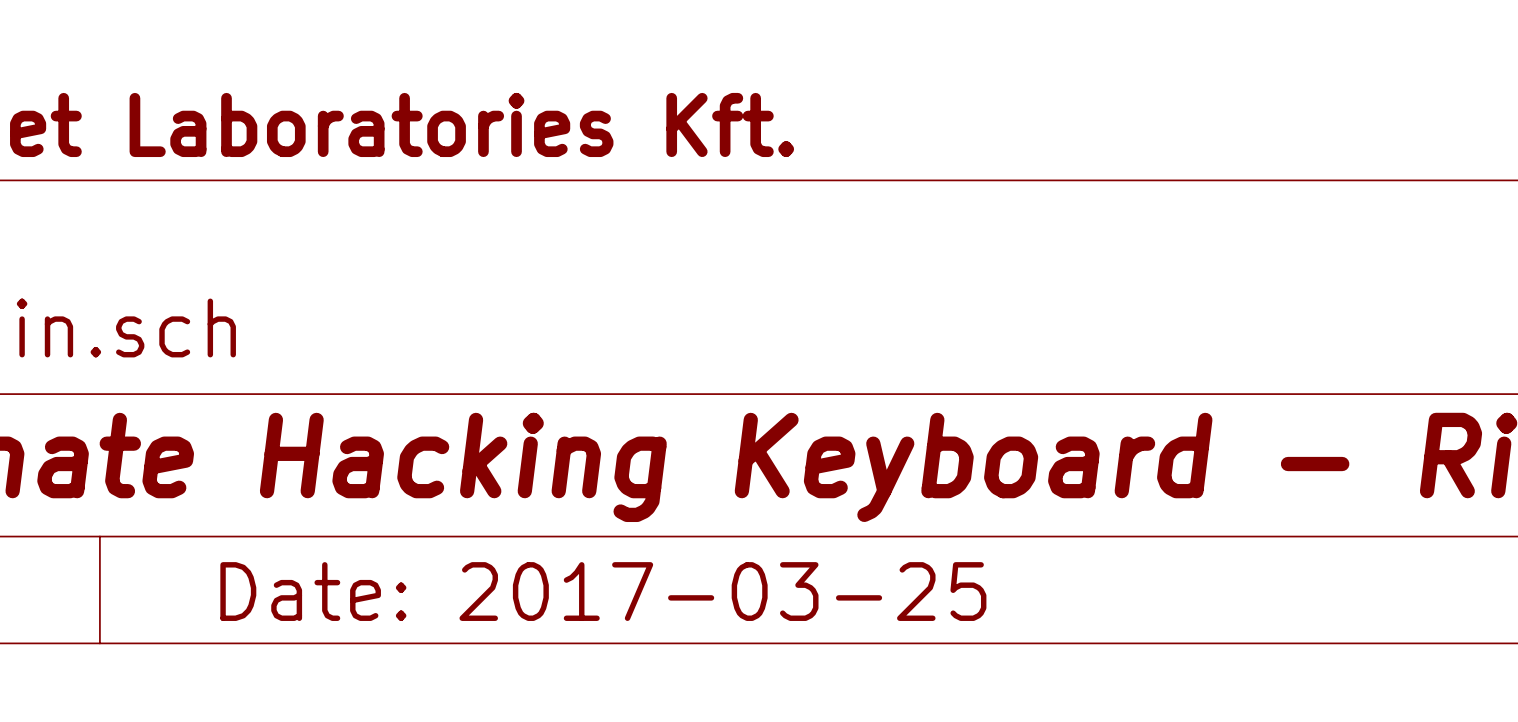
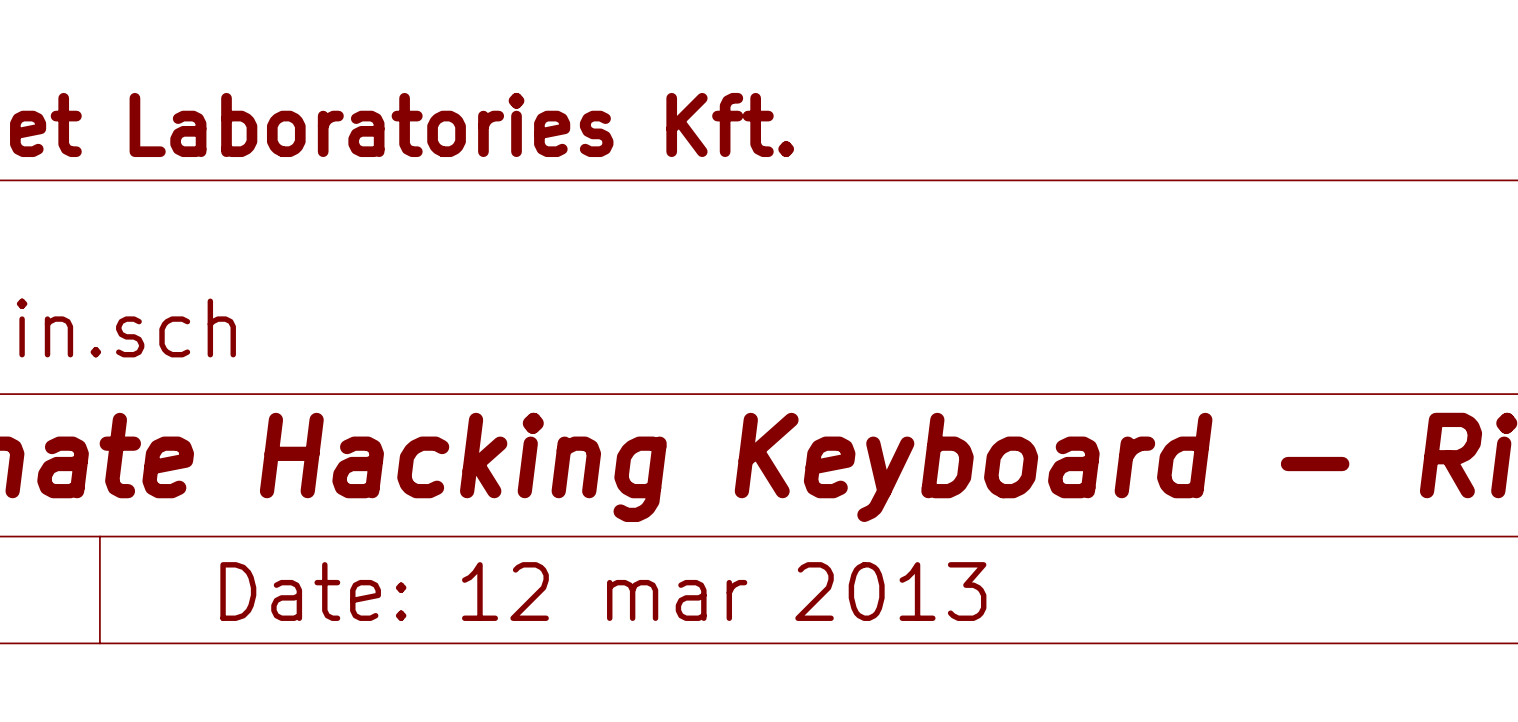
title block: Date: 2017-03-25 (603, 591) -> Date: 12 mar 2013 (603, 591)

